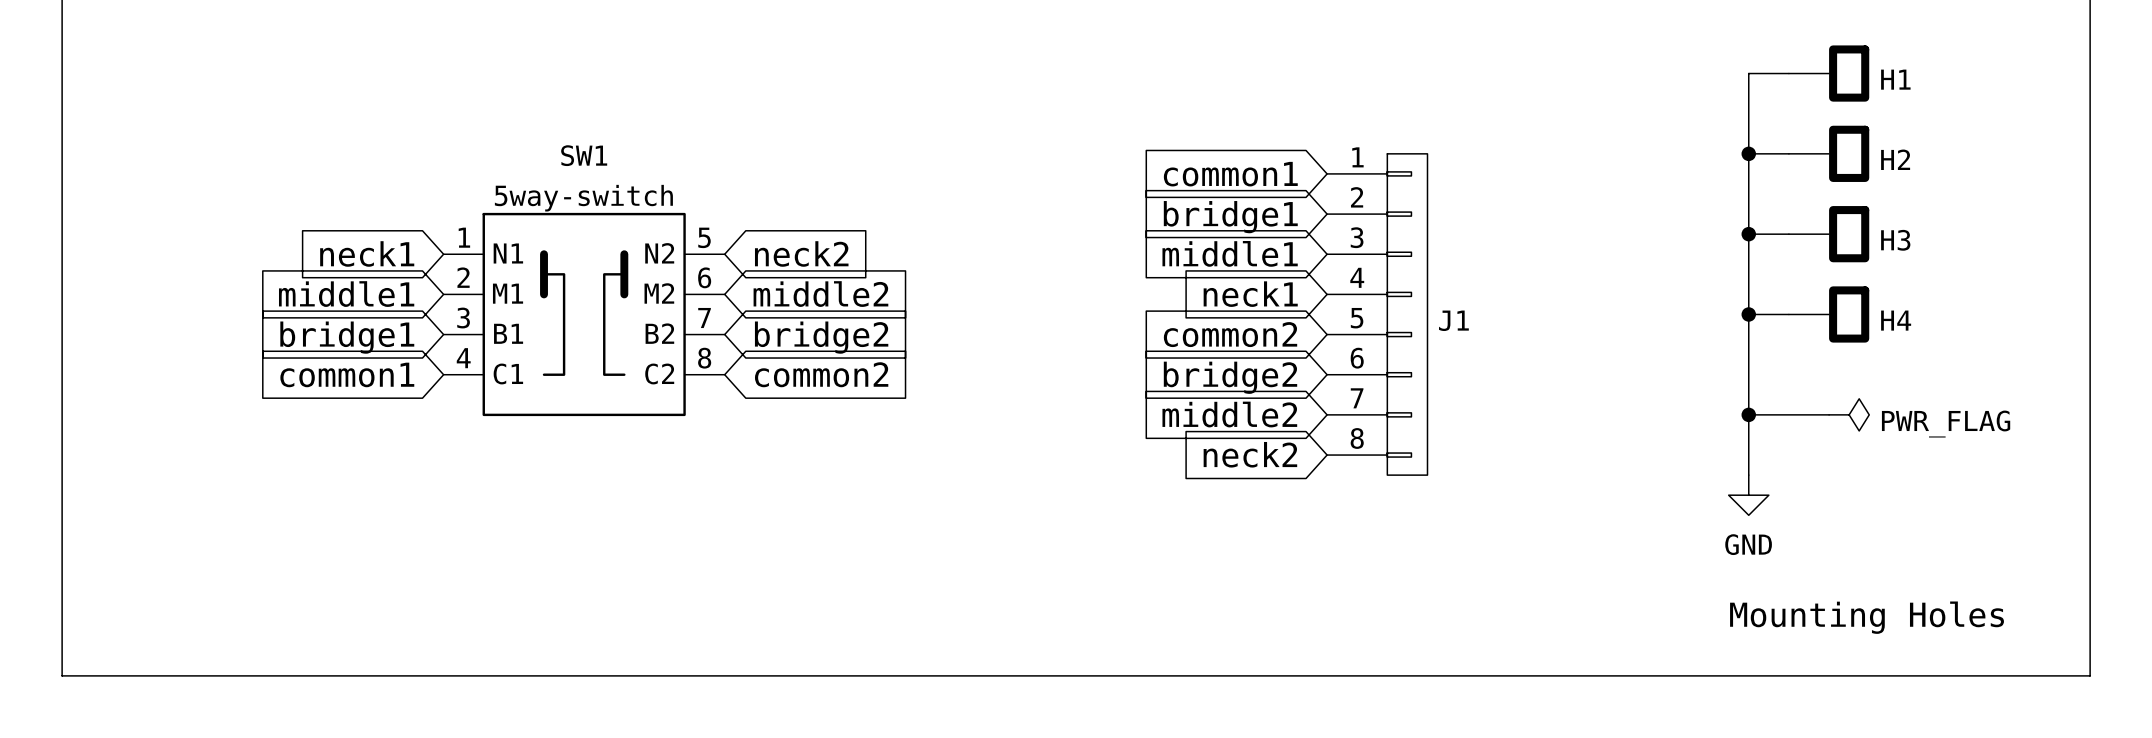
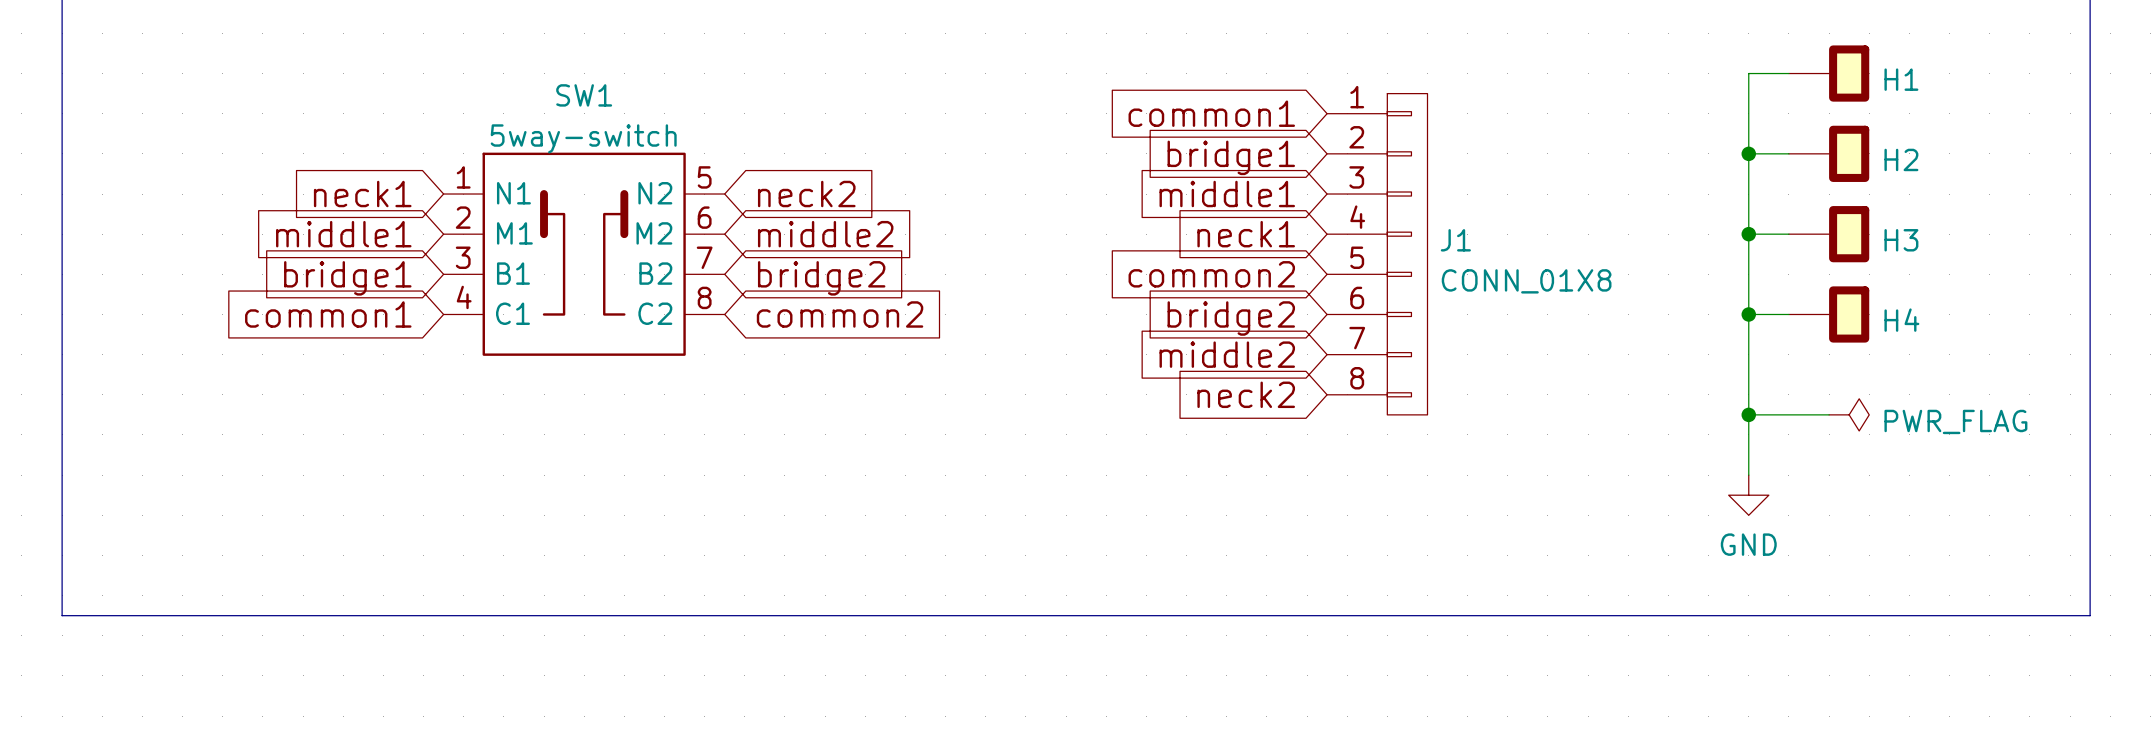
global label position: common1 (1230, 174) -> common1 (1211, 113)
global label position: bridge1 (1230, 217) -> bridge1 (1231, 157)
global label position: neck1 (367, 253) -> neck1 (362, 194)
global label position: neck2 (801, 253) -> neck2 (806, 194)
global label position: middle1 (1230, 253) -> middle1 (1227, 194)
J1 value: none -> CONN_01X8 (1526, 281)
global label position: middle1 (346, 294) -> middle1 (343, 234)
global label position: middle2 (820, 294) -> middle2 (825, 234)
global label position: neck1 (1250, 294) -> neck1 (1246, 234)
SW1 position: (584, 314) -> (584, 254)
J1 position: (1377, 314) -> (1377, 254)
J1 name position: J1 (1453, 320) -> J1 (1455, 240)
global label position: common2 (1230, 334) -> common2 (1211, 274)
global label position: bridge1 (347, 337) -> bridge1 (347, 278)
global label position: bridge2 (821, 337) -> bridge2 (821, 278)
global label position: common1 (347, 374) -> common1 (328, 314)
global label position: common2 (821, 374) -> common2 (840, 314)
global label position: bridge2 (1230, 377) -> bridge2 (1231, 318)
global label position: middle2 (1229, 414) -> middle2 (1227, 354)
global label position: neck2 (1250, 454) -> neck2 (1246, 394)
line: (62, 615) (62, 675) (2090, 675) (2090, 615) -> (62, 615) (2090, 615)
label: Mounting Holes (1867, 617) -> none

